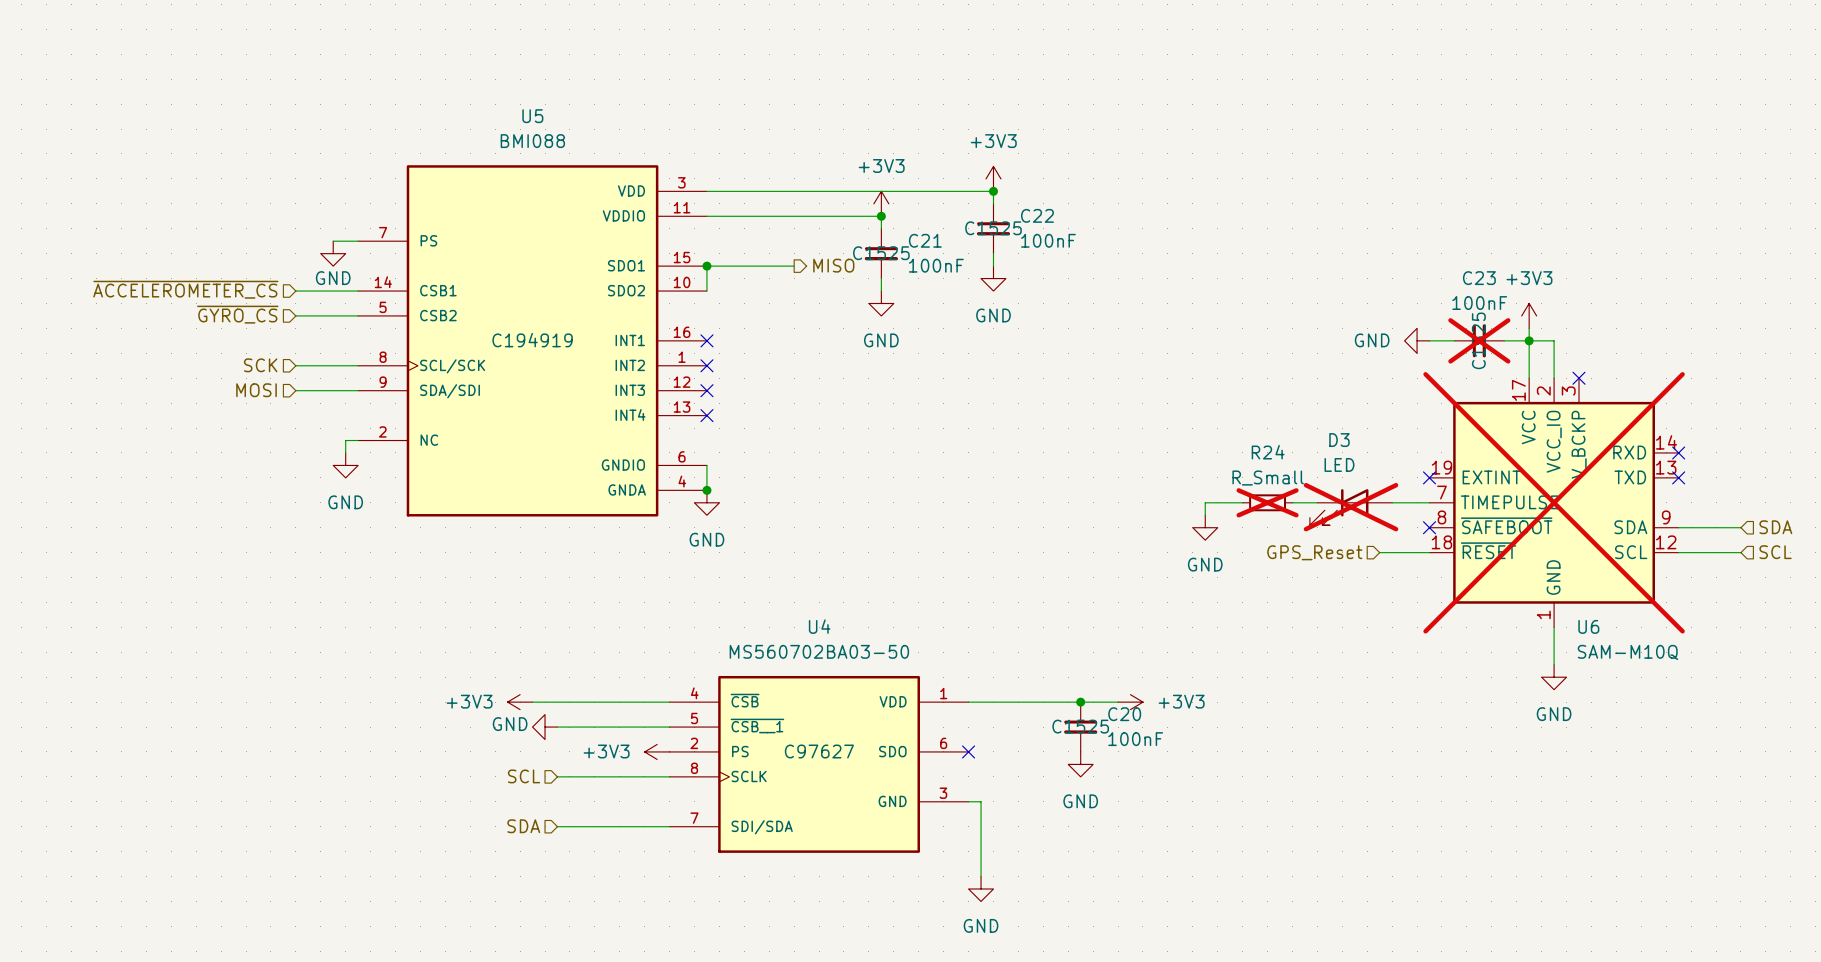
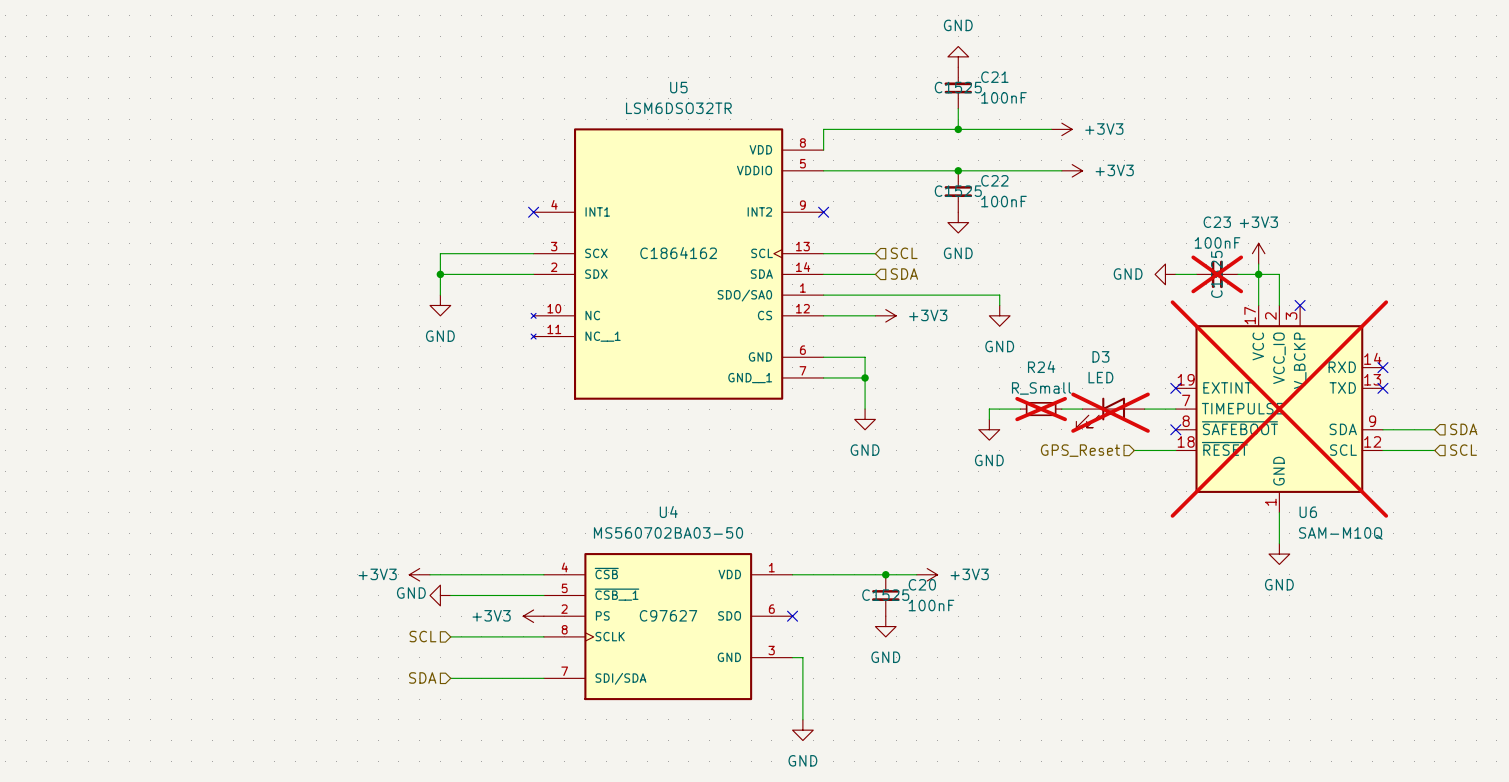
power symbol: none -> GND (958, 56)
U5 value: BMI088 (532, 141) -> LSM6DSO32TR (678, 108)
wire: none -> (958, 108) (958, 129)
U5 symbol: [358, 165, 707, 517] -> [531, 128, 824, 400]
junction: none -> (958, 129)
wire: none -> (1051, 129) (823, 129) (823, 150)
power symbol: none -> +3V3 (1061, 129)
power symbol: +3V3 (993, 178) -> none
junction: (993, 191) -> none
power symbol: +3V3 (881, 203) -> none
junction: (881, 216) -> none
wire: none -> (823, 170) (1061, 170)
junction: none -> (958, 170)
power symbol: none -> +3V3 (1072, 170)
C22 position: (993, 228) -> (958, 191)
wire: (333, 241) (358, 241) -> none
power symbol: GND (333, 253) -> none
C21 rotation: 0° (881, 253) -> 180° (958, 87)
C21 position: (881, 253) -> (958, 87)
wire: (993, 253) (993, 266) -> none
hierarchical label: MISO (833, 265) -> none
no-connect mark: none -> (533, 212)
junction: (706, 266) -> none
no-connect mark: none -> (823, 212)
power symbol: GND (993, 278) -> none
power symbol: none -> GND (958, 222)
hierarchical label: ~{ACCELEROMETER_CS} (185, 289) -> none
wire: (295, 291) (358, 291) -> none
power symbol: GND (881, 303) -> none
hierarchical label: ~{GYRO_CS} (237, 314) -> none
wire: (295, 315) (358, 315) -> none
wire: none -> (823, 253) (875, 253)
hierarchical label: none -> SCL (904, 253)
U5 text: C194919 (532, 340) -> C1864162 (678, 253)
junction: none -> (440, 274)
no-connect mark: (706, 340) -> none
wire: none -> (823, 274) (875, 274)
hierarchical label: none -> SDA (904, 274)
hierarchical label: SCK (260, 365) -> none
wire: (295, 365) (358, 365) -> none
no-connect mark: (706, 365) -> none
wire: none -> (823, 295) (999, 295) (999, 305)
power symbol: none -> GND (440, 305)
hierarchical label: MOSI (256, 390) -> none
wire: (295, 390) (358, 390) -> none
no-connect mark: (706, 390) -> none
wire: none -> (823, 315) (875, 315)
power symbol: none -> +3V3 (885, 315)
power symbol: none -> GND (999, 315)
no-connect mark: (706, 415) -> none
wire: (358, 440) (345, 440) (345, 452) -> none
wire: none -> (823, 357) (865, 357) (865, 409)
power symbol: GND (345, 465) -> none
wire: none -> (823, 377) (865, 377)
junction: none -> (865, 377)
junction: (706, 490) -> none
power symbol: GND (706, 502) -> none
power symbol: none -> GND (865, 419)

